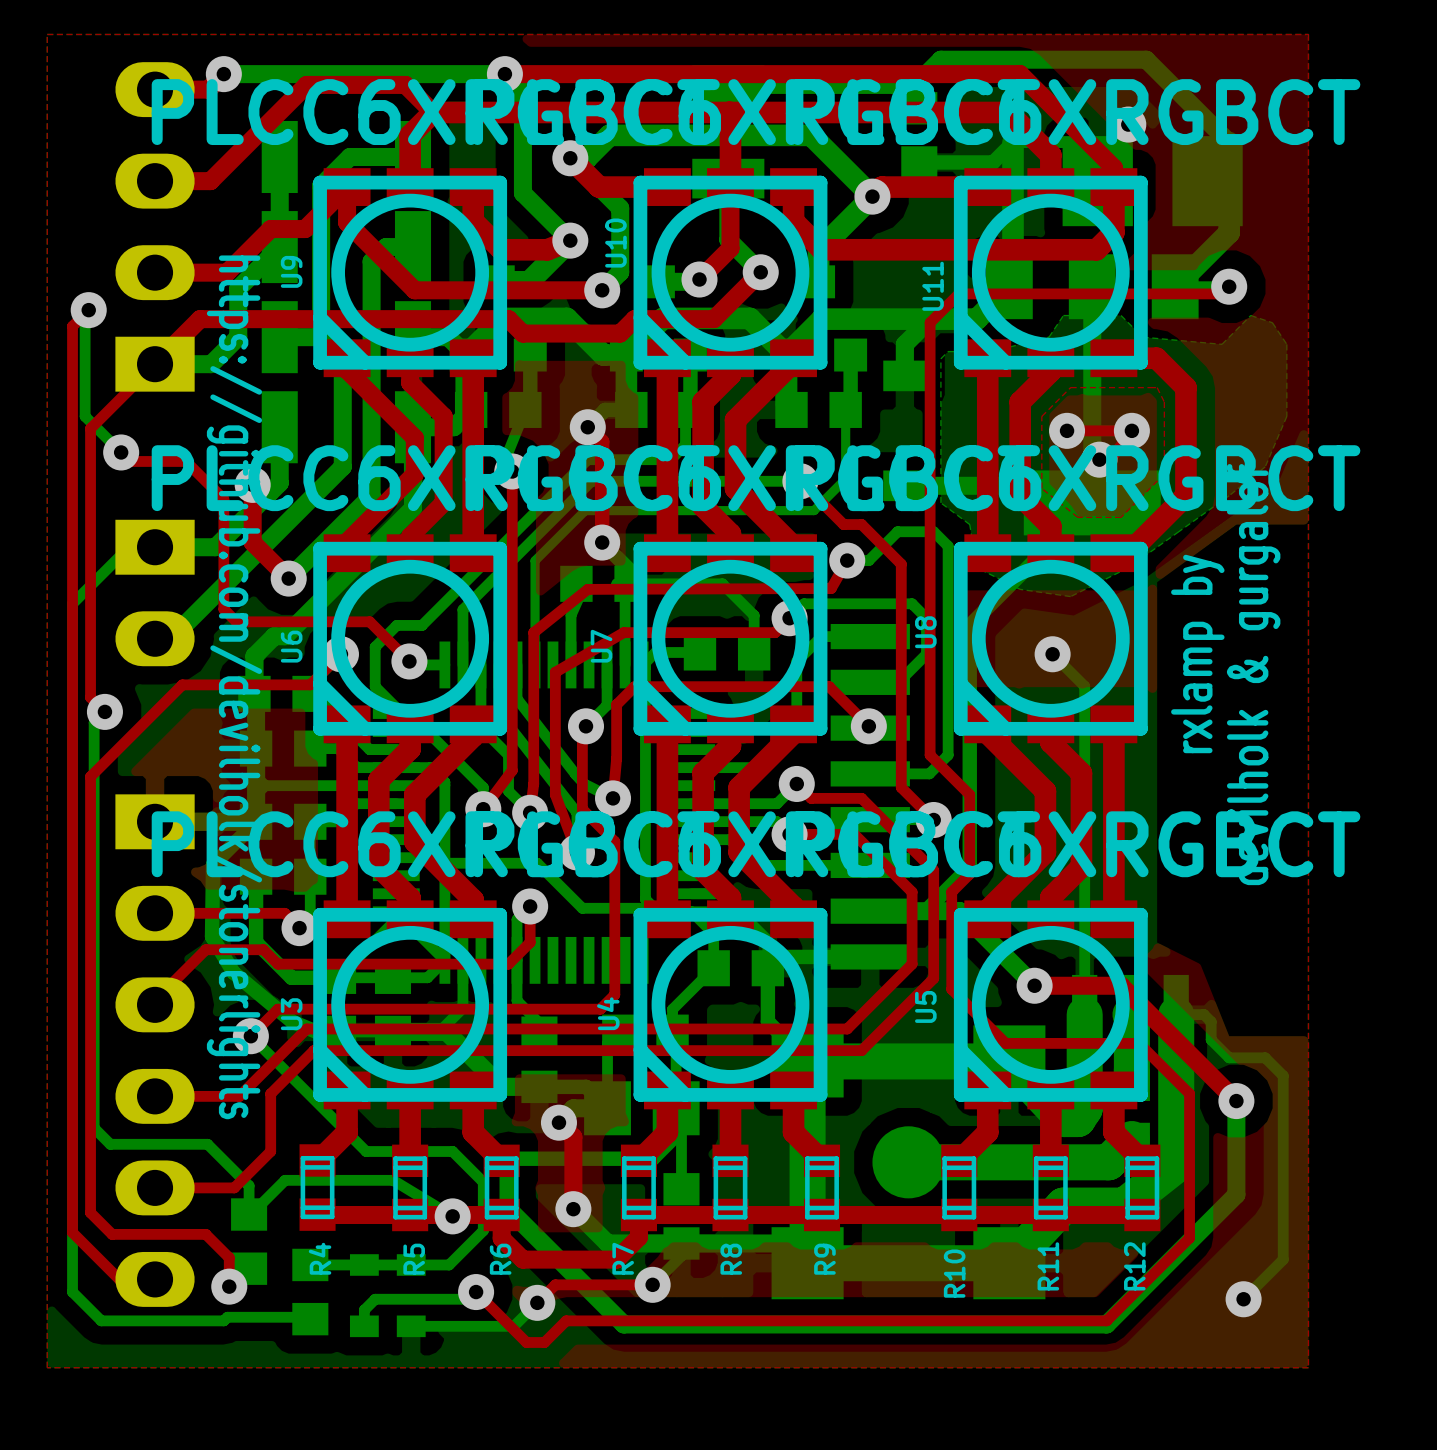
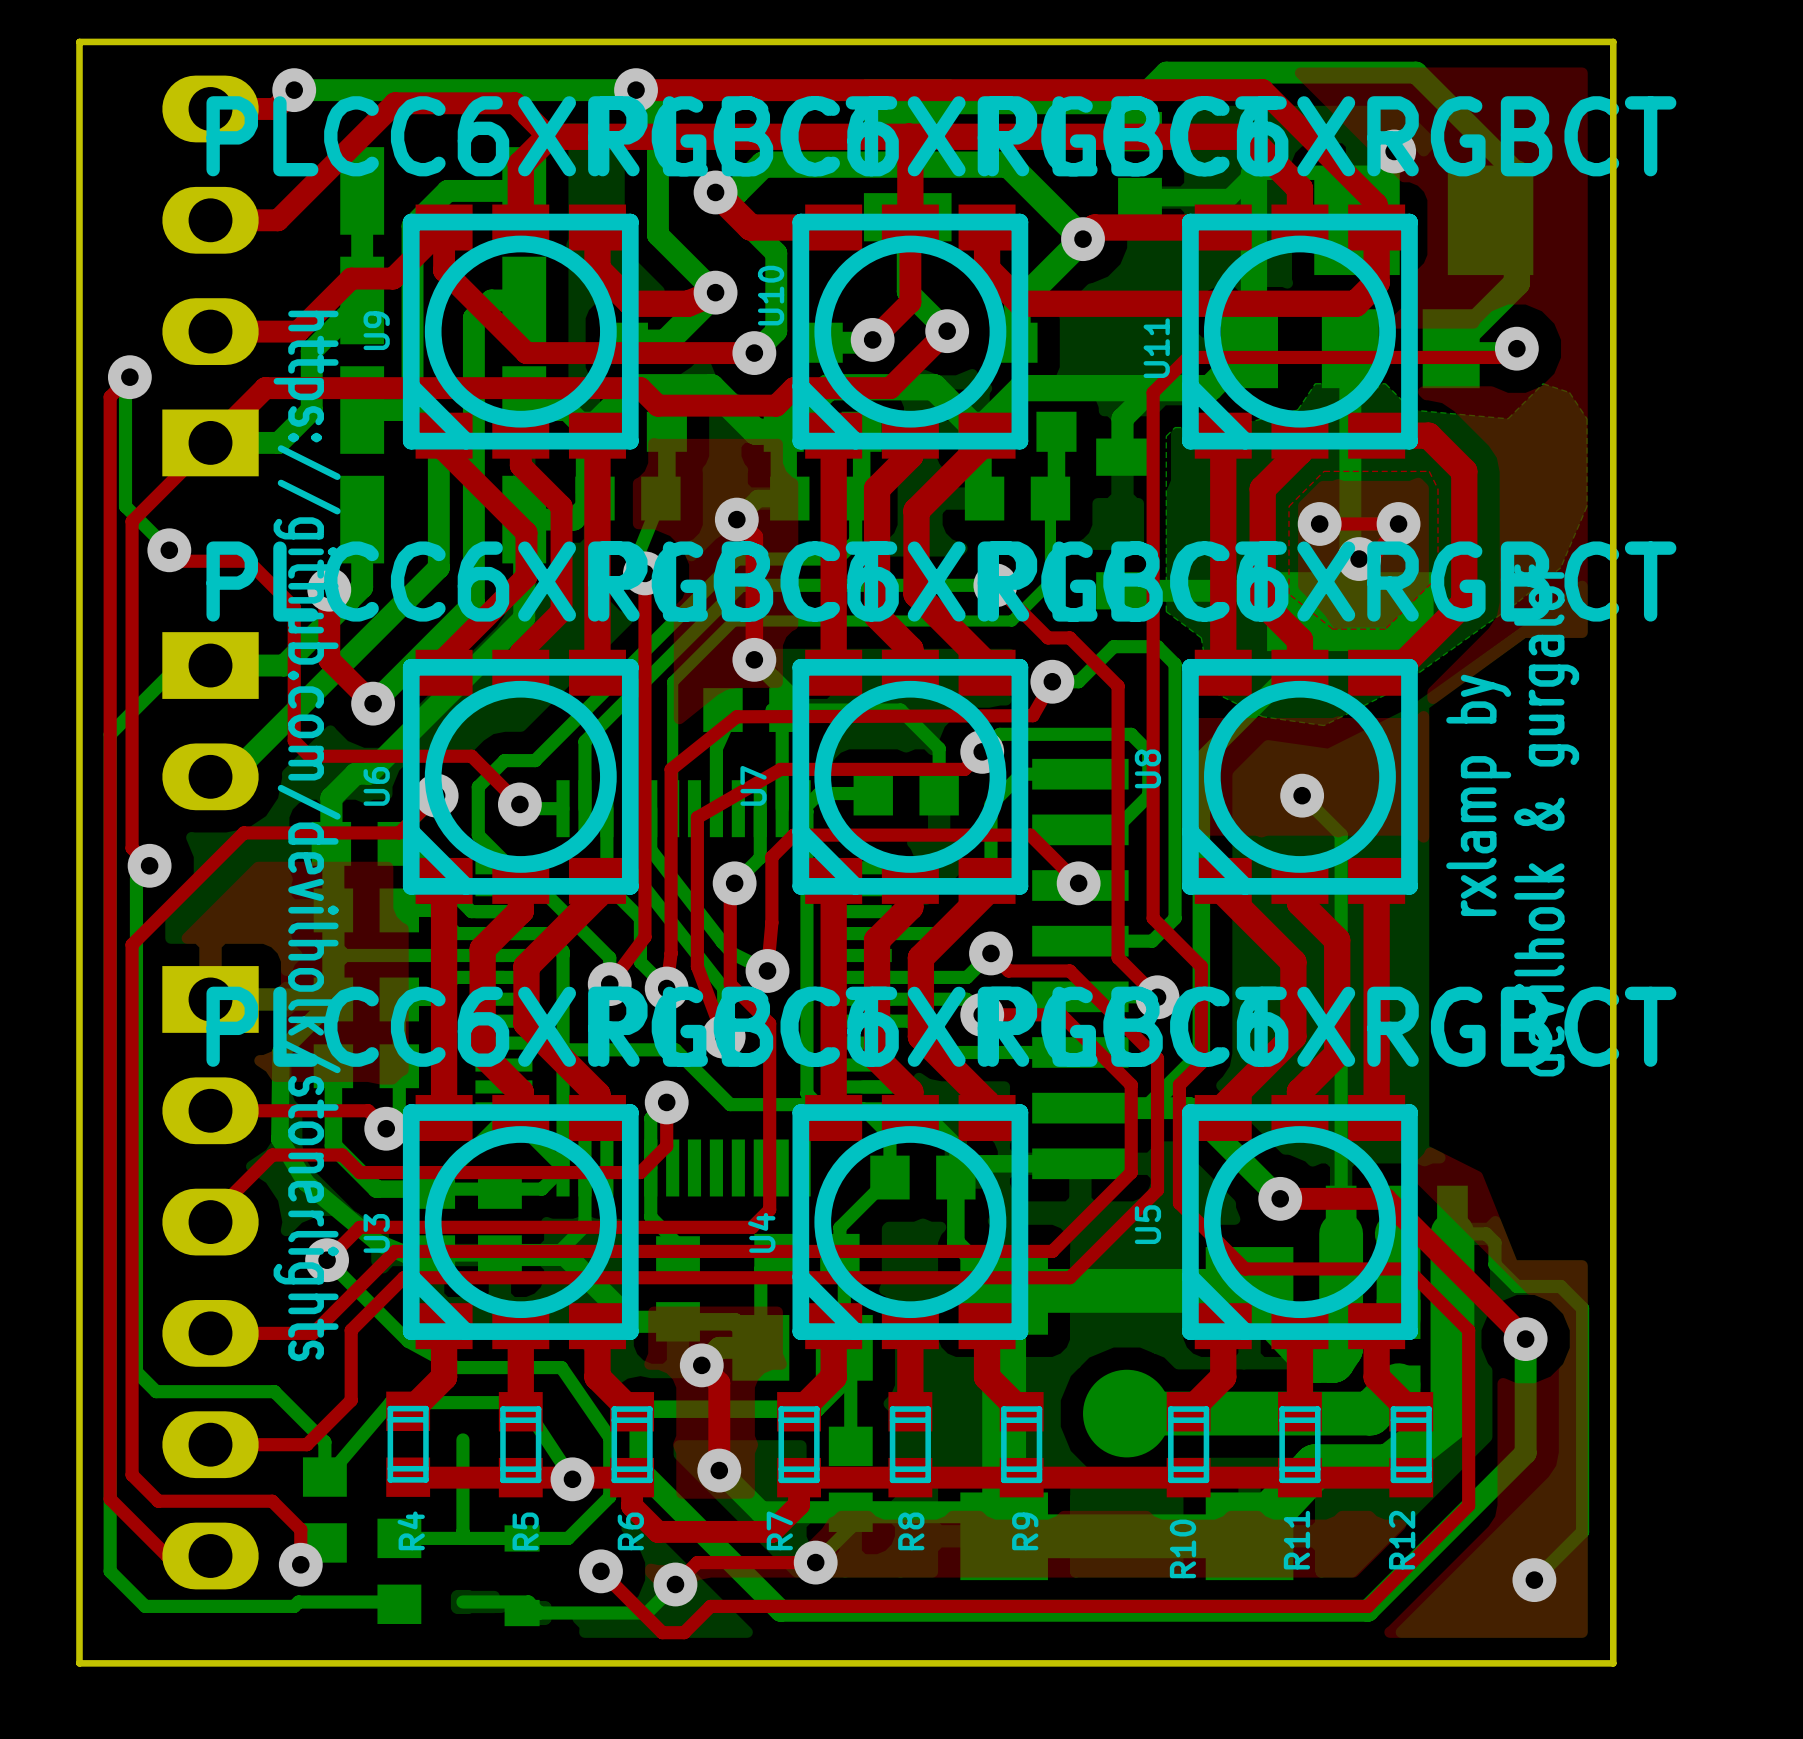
board edge: none -> (79, 41) (79, 1663) (1613, 1663) (1613, 41) (79, 41)
bottom track: (317, 1102) (366, 1151) (452, 1151) (483, 1182) -> (408, 1341) (456, 1367) (561, 1367) (609, 1437)
bottom track: none -> (462, 1439) (462, 1538)
bottom track: (250, 1214) (285, 1180) (393, 1180) (452, 1216) -> (327, 1477) (390, 1402) (522, 1402) (572, 1479)
bottom track: (476, 1292) (468, 1299) (375, 1299) (364, 1310) (364, 1326) -> none
part: (364, 1295) -> none
bottom track: none -> (462, 1601) (528, 1601) (539, 1613)

